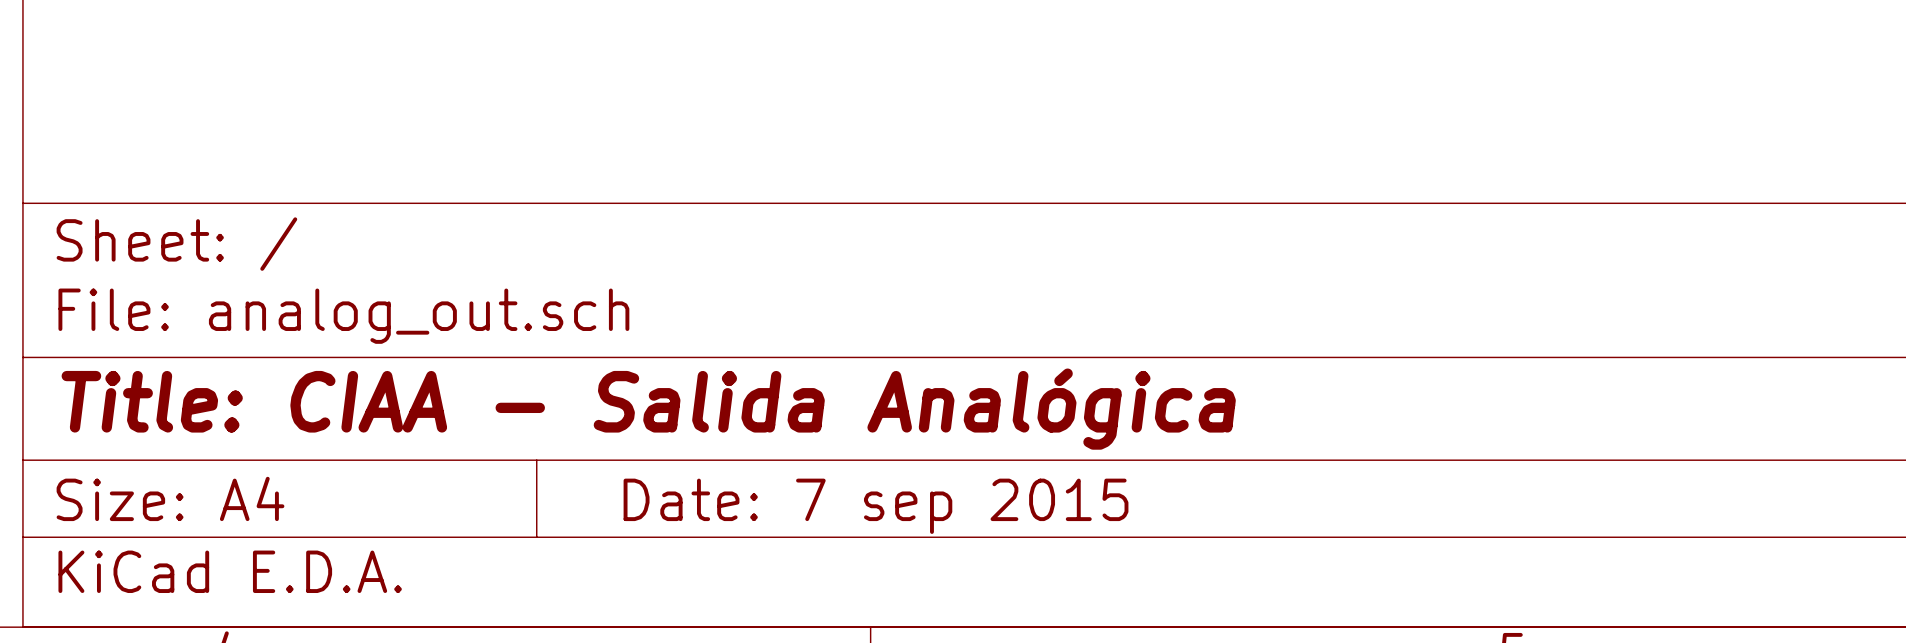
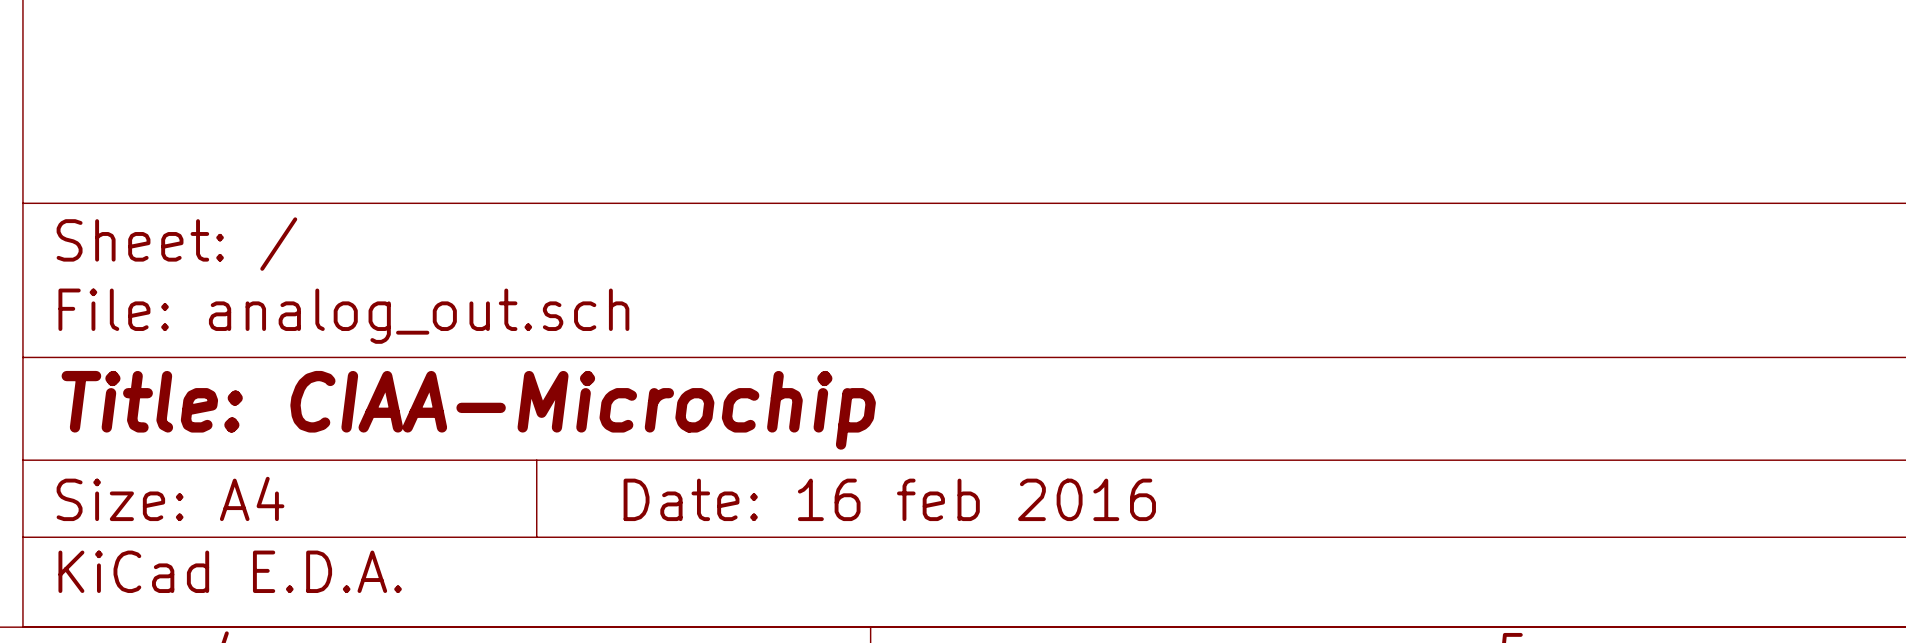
title block: Title: CIAA - Salida Analógica (648, 409) -> Title: CIAA-Microchip (468, 410)
title block: Date: 7 sep 2015 (876, 506) -> Date: 16 feb 2016 (889, 499)

